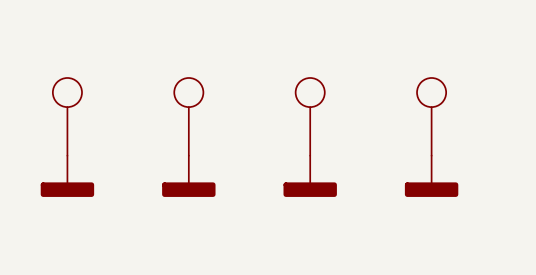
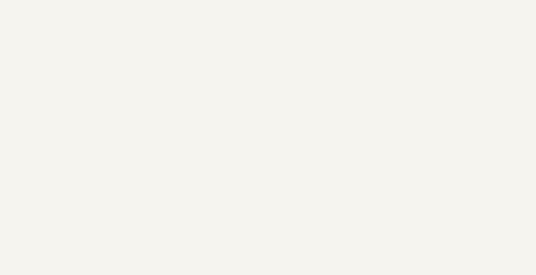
part: (67, 116) -> none
part: (188, 116) -> none
part: (310, 116) -> none
part: (431, 116) -> none
power symbol: (67, 176) -> none
power symbol: (188, 176) -> none
power symbol: (310, 176) -> none
power symbol: (431, 176) -> none

